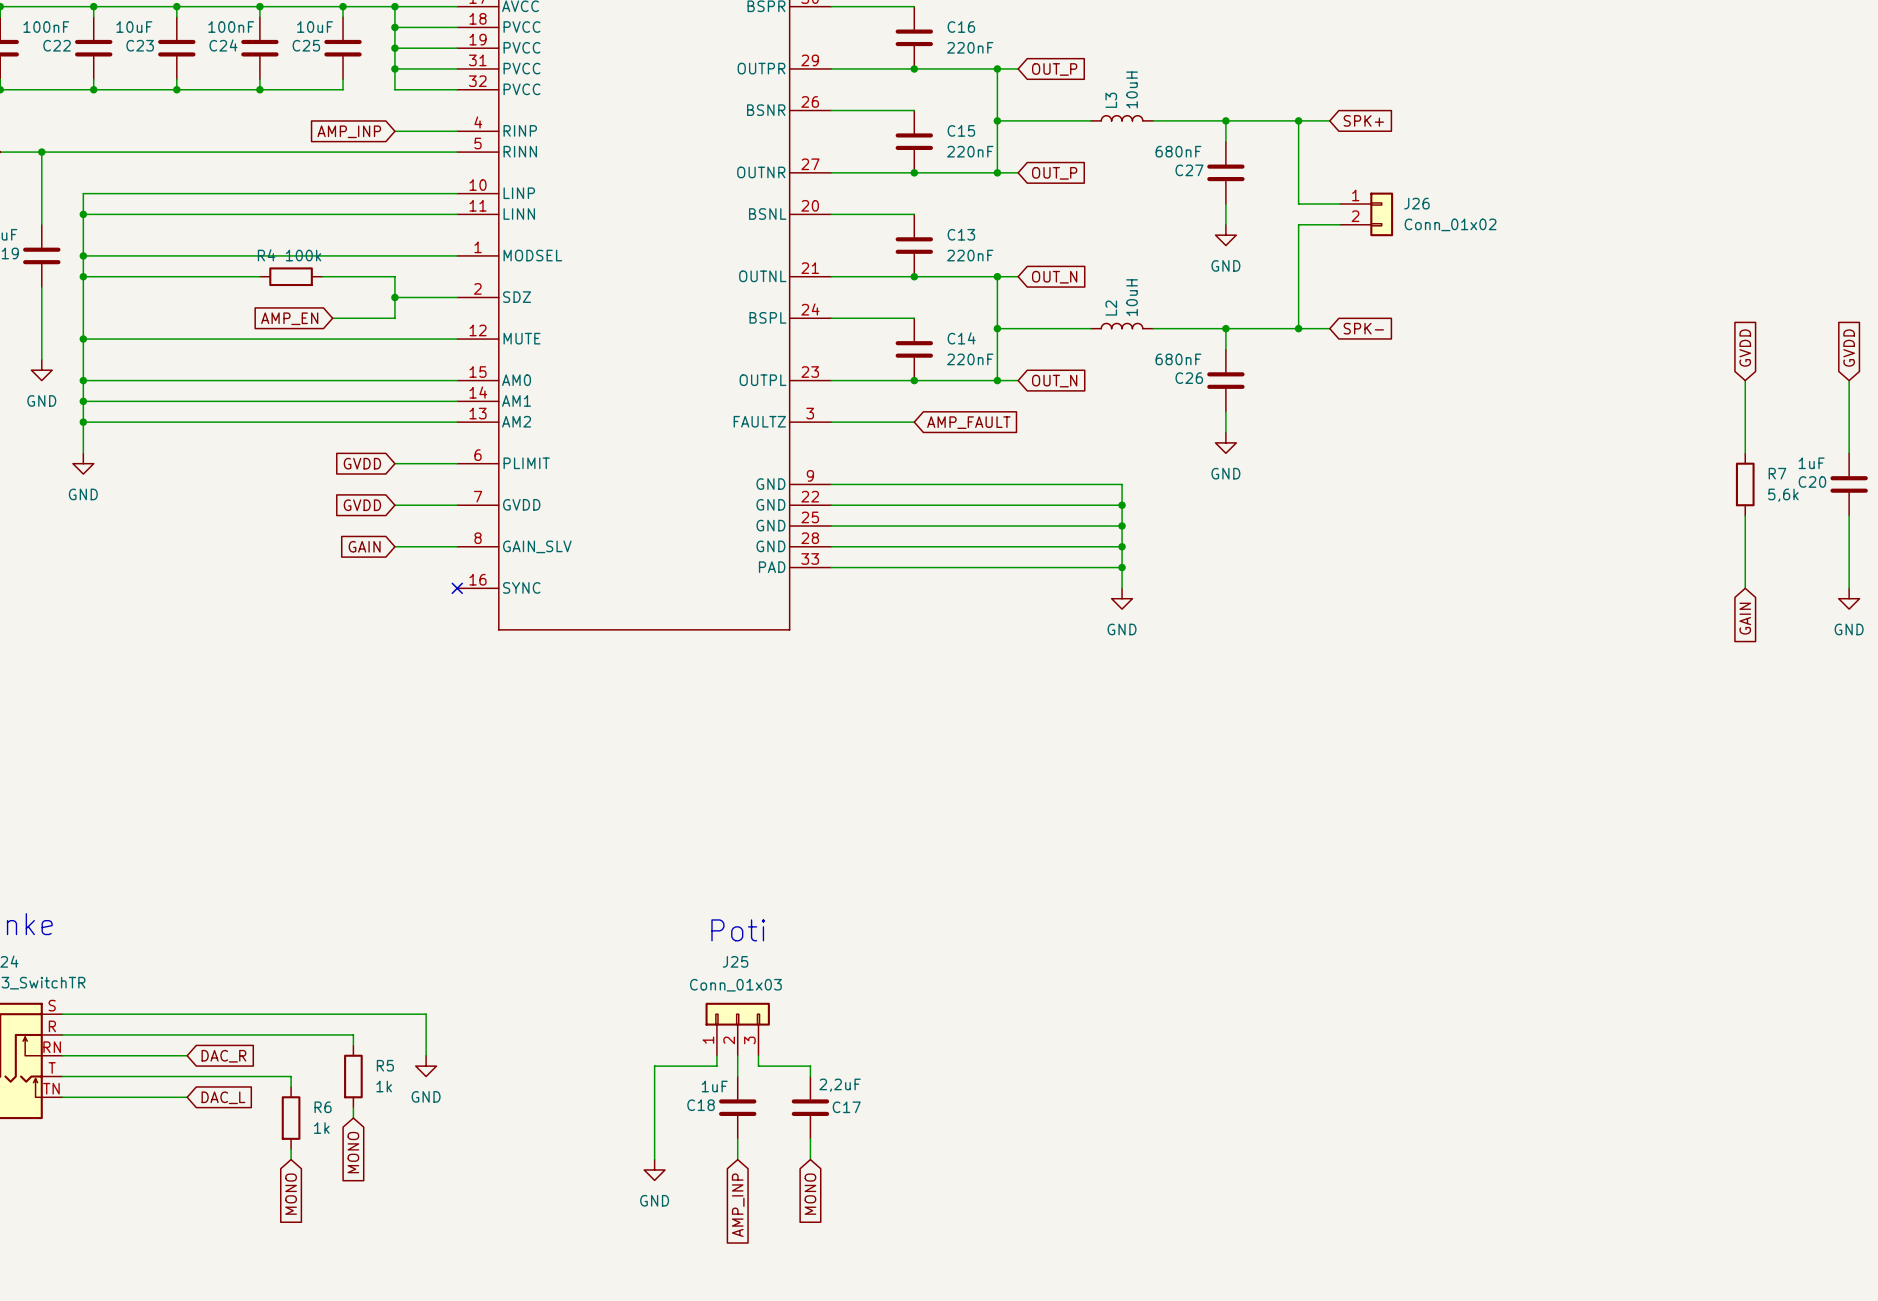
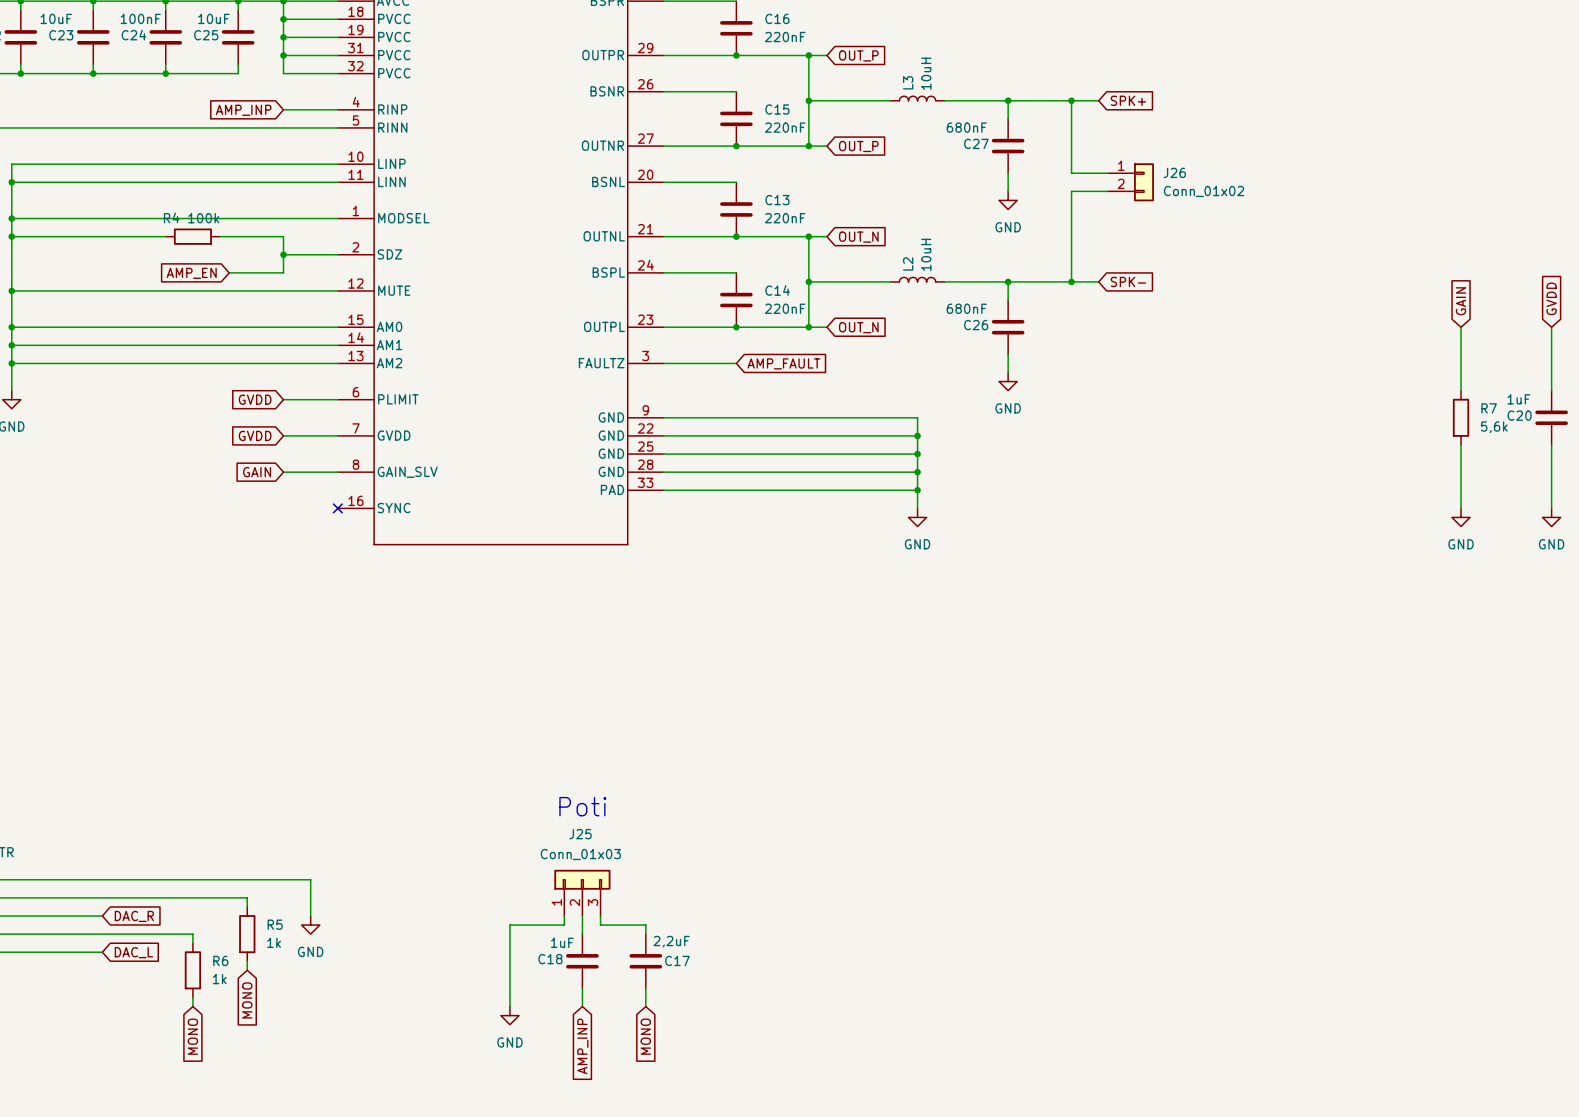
global label: GVDD (1745, 348) -> GAIN (1461, 301)
power symbol: none -> GND (1461, 517)
global label: GAIN (1745, 618) -> none

